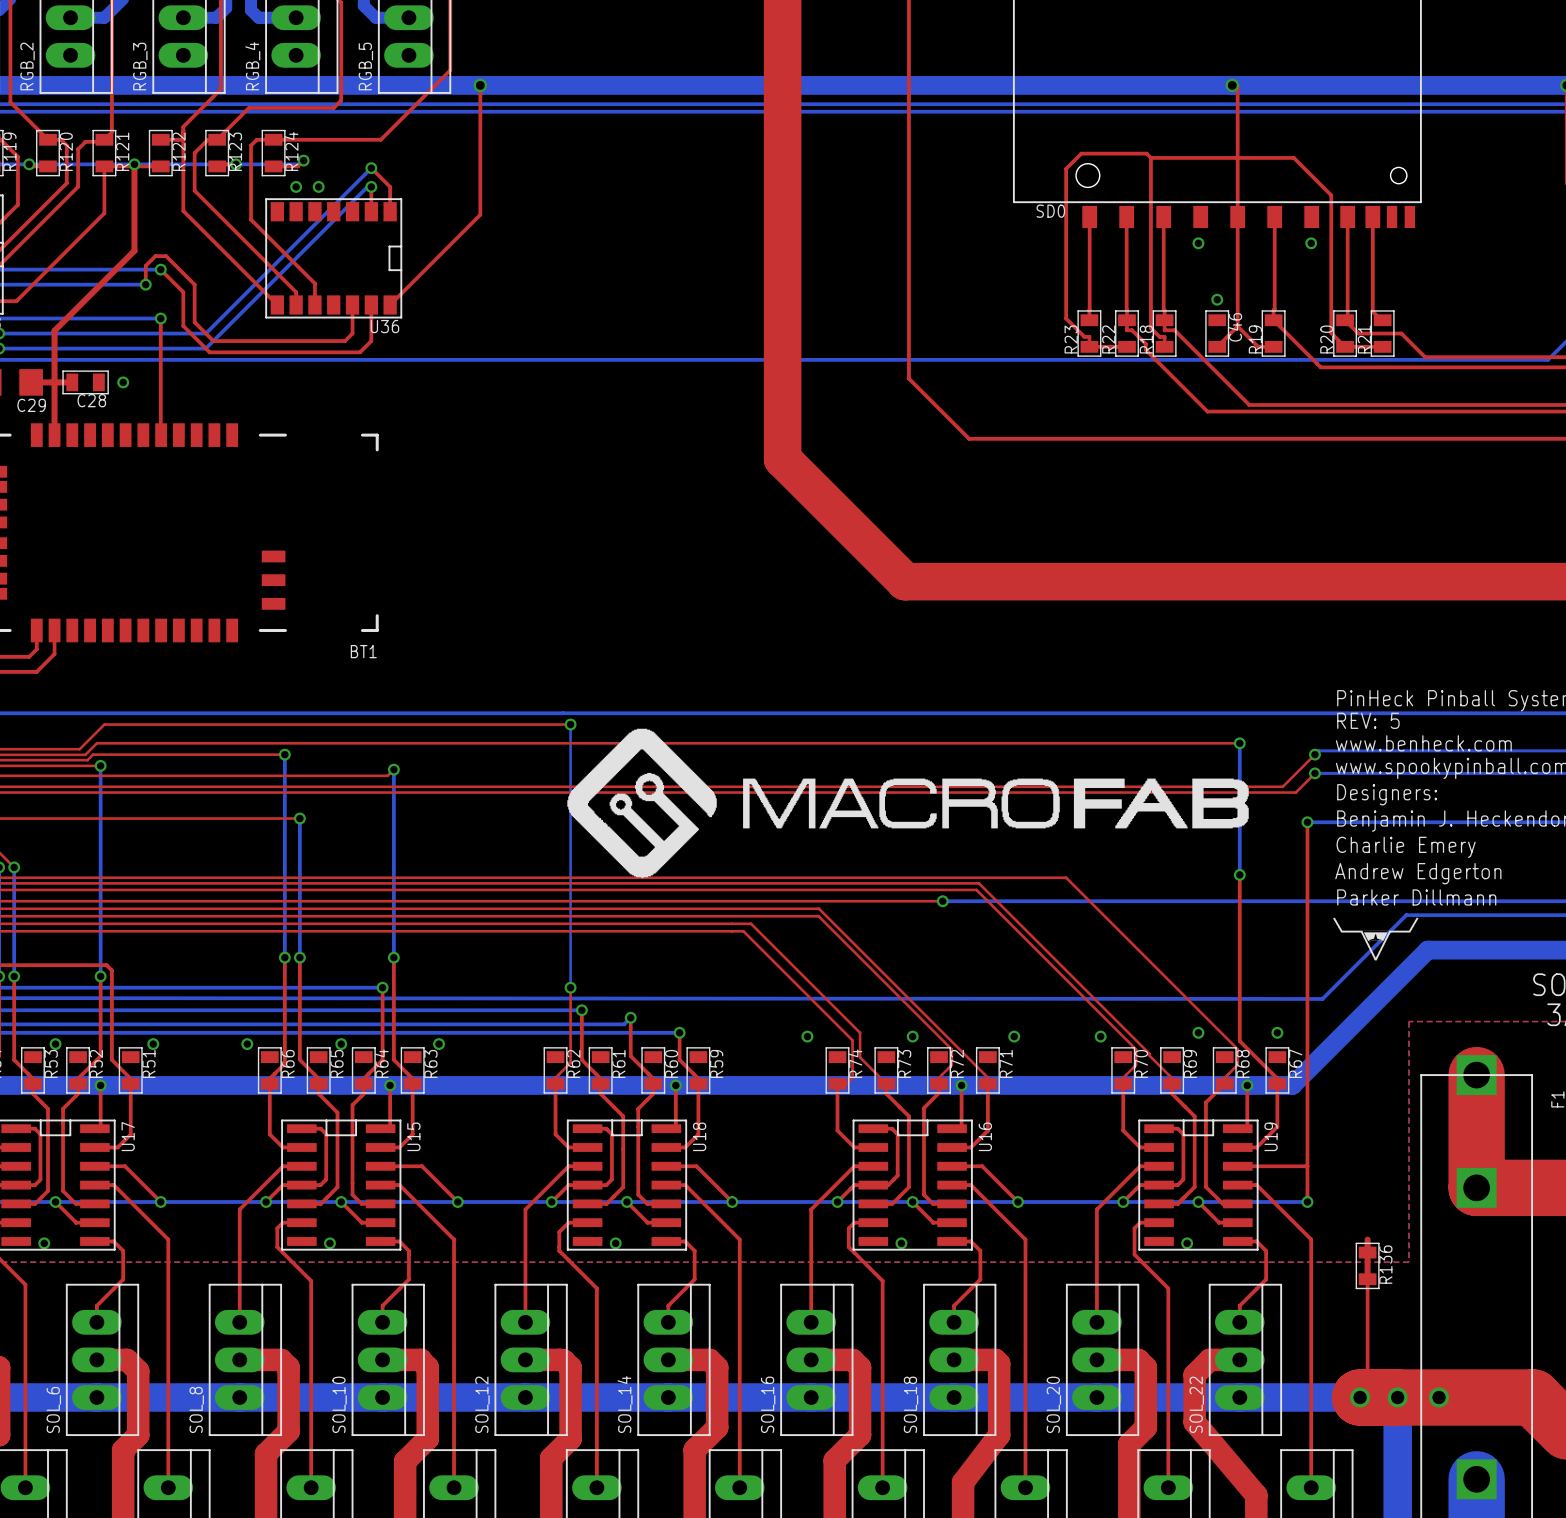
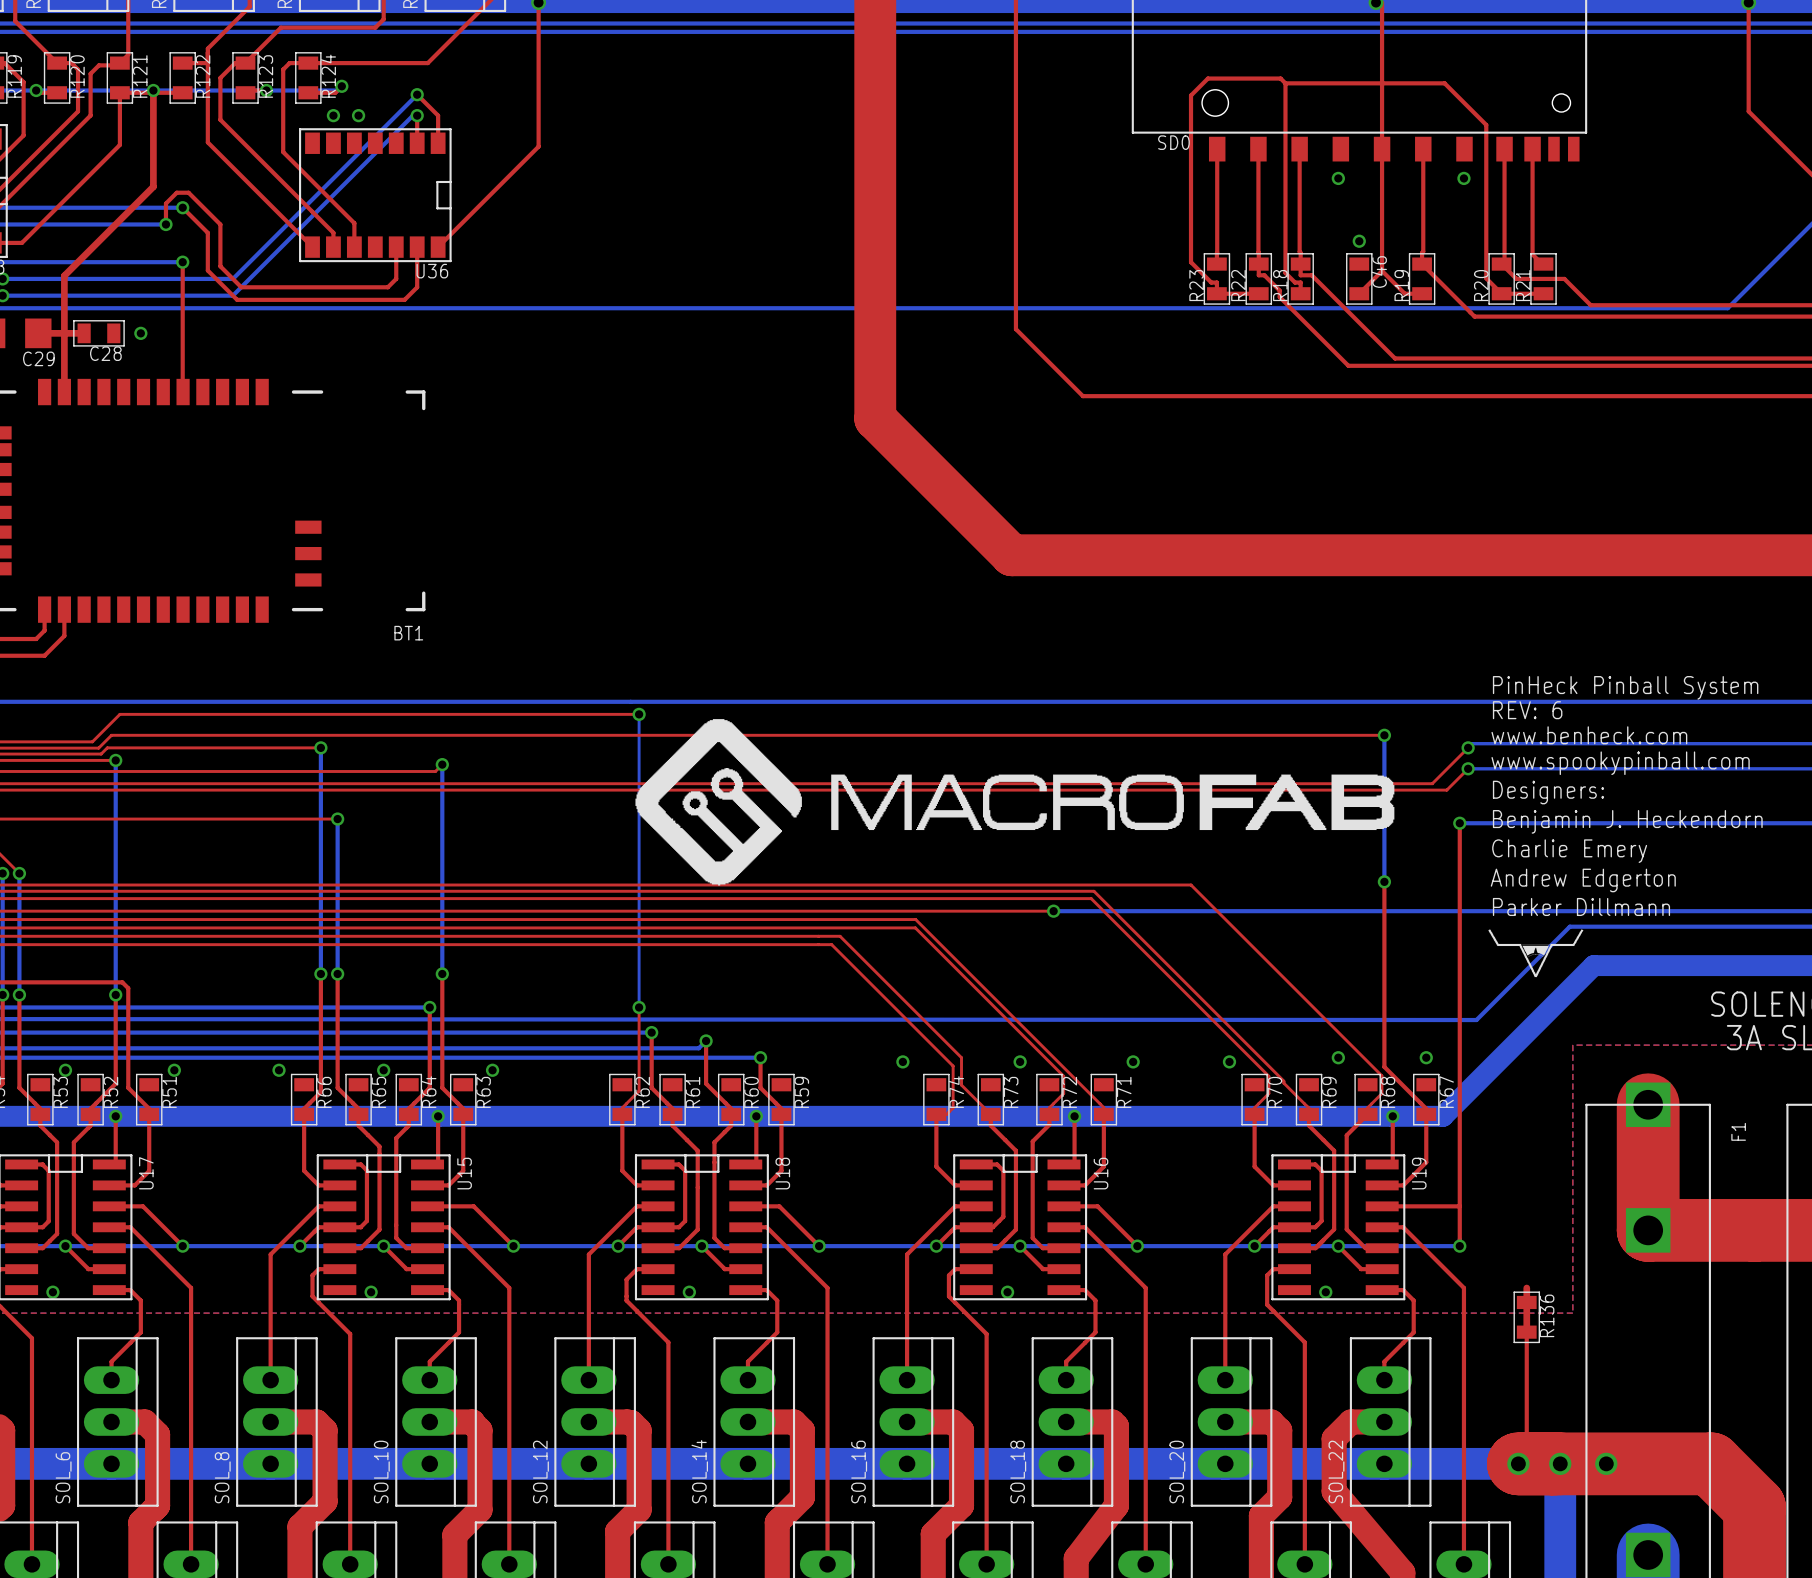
text: REV: 5 (1368, 720) -> REV: 6 (1527, 710)

